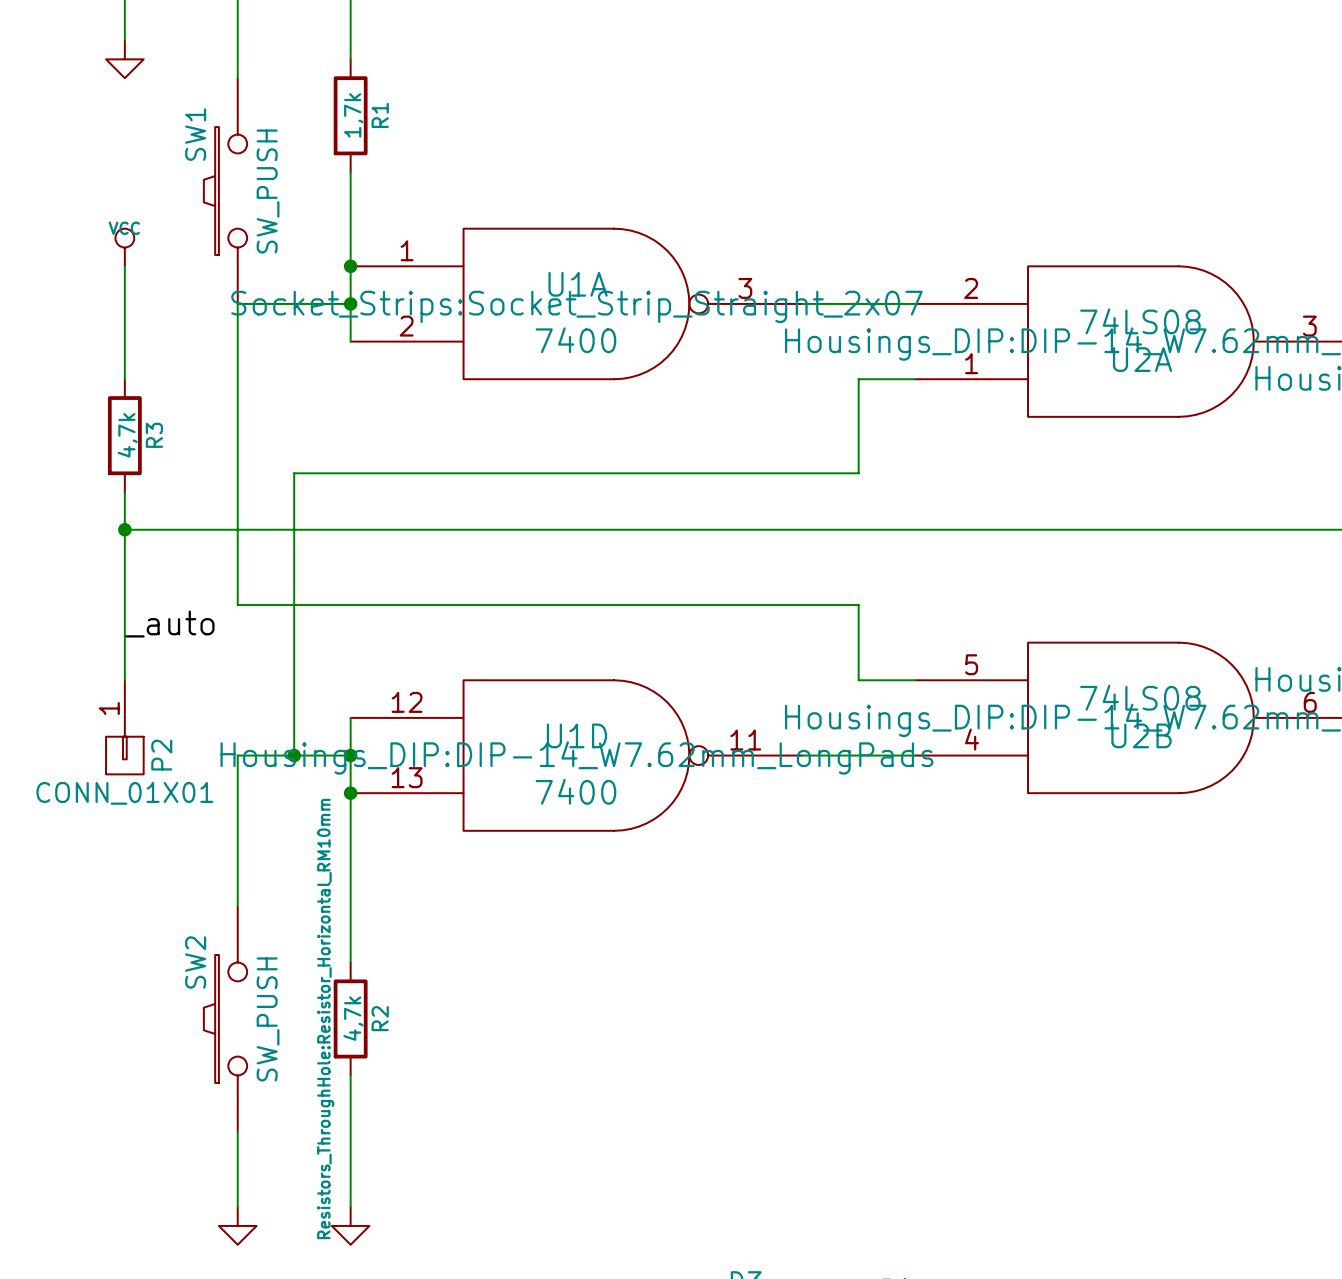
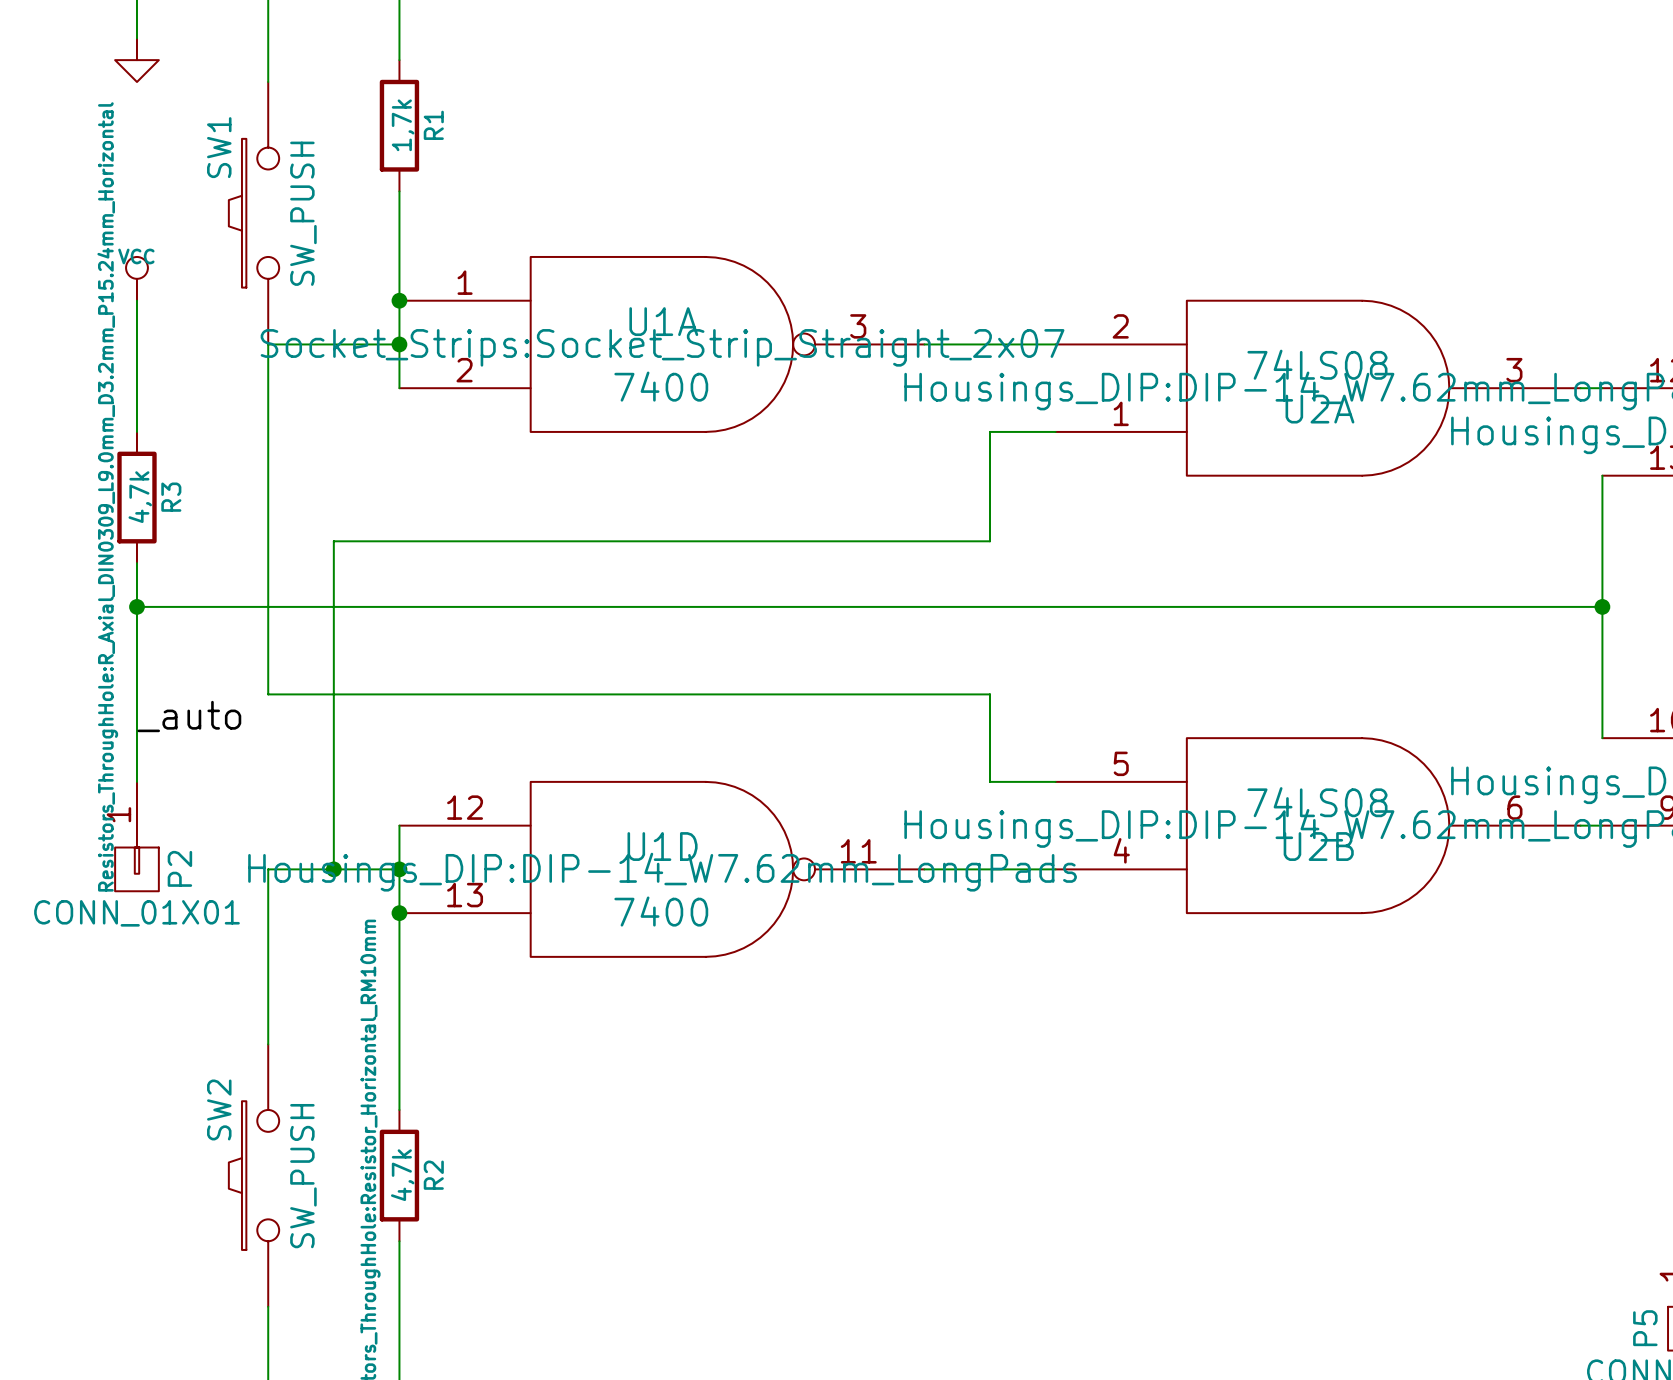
R3 text: none -> Resistors_ThroughHole:R_Axial_DIN0309_L9.0mm_D3.2mm_P15.24mm_Horizontal (107, 496)

